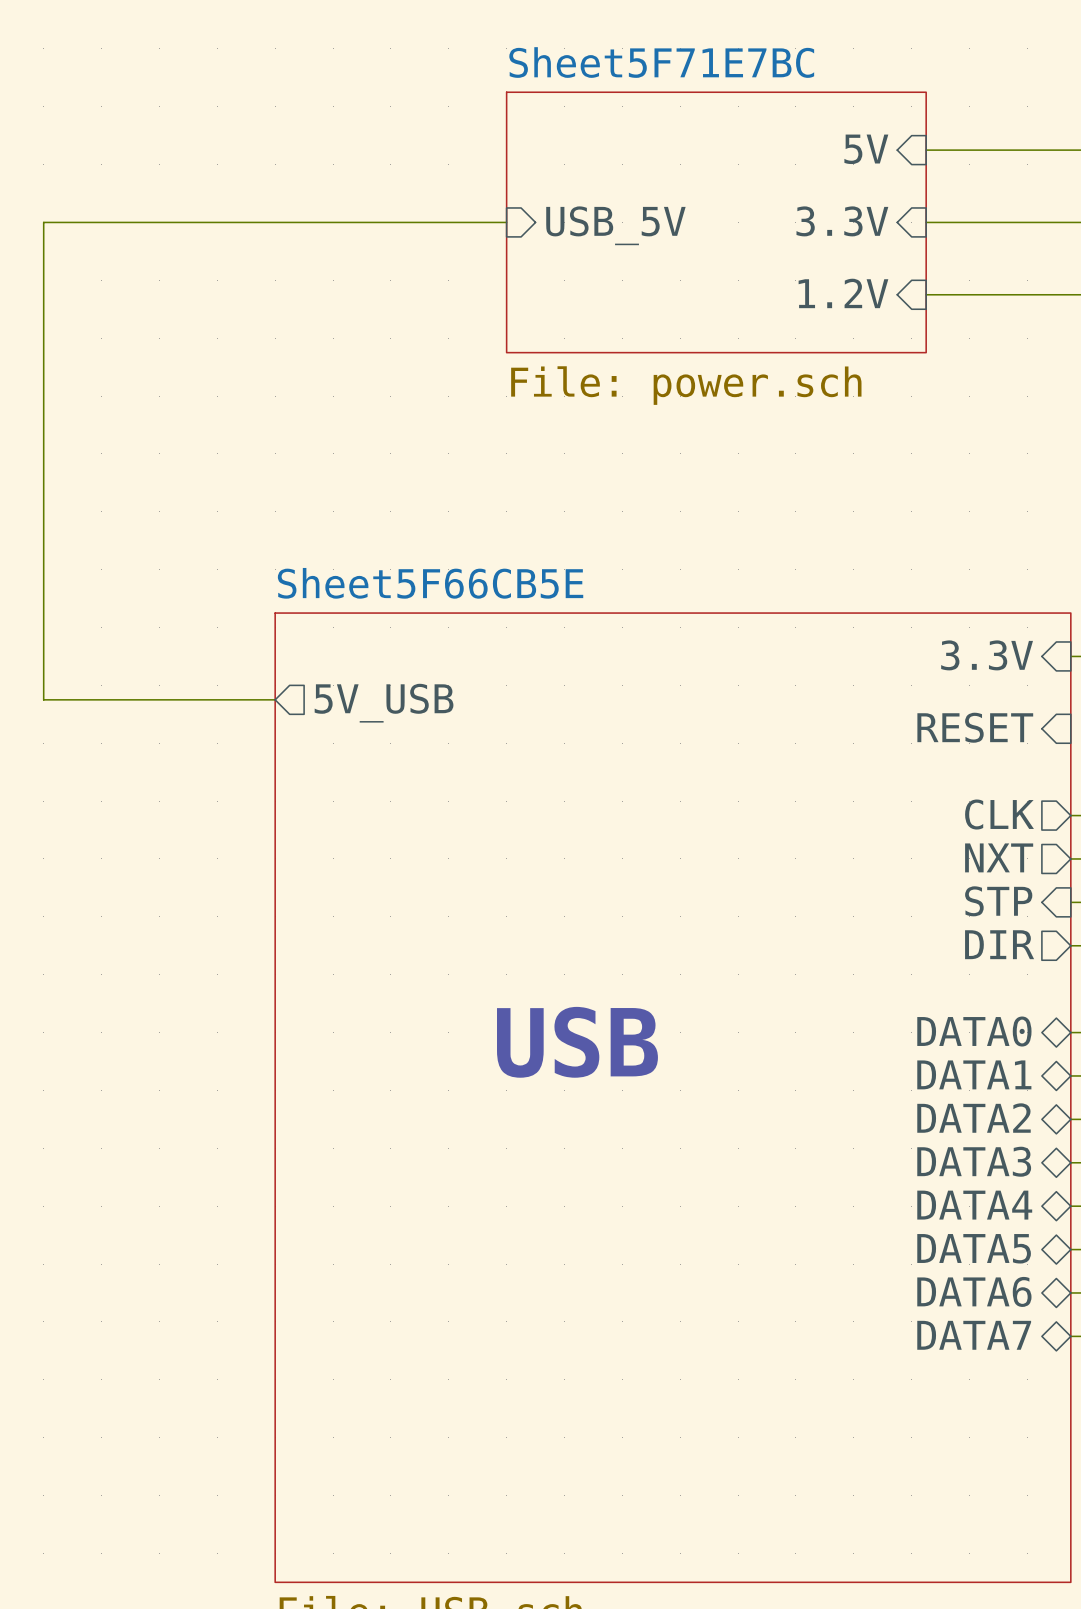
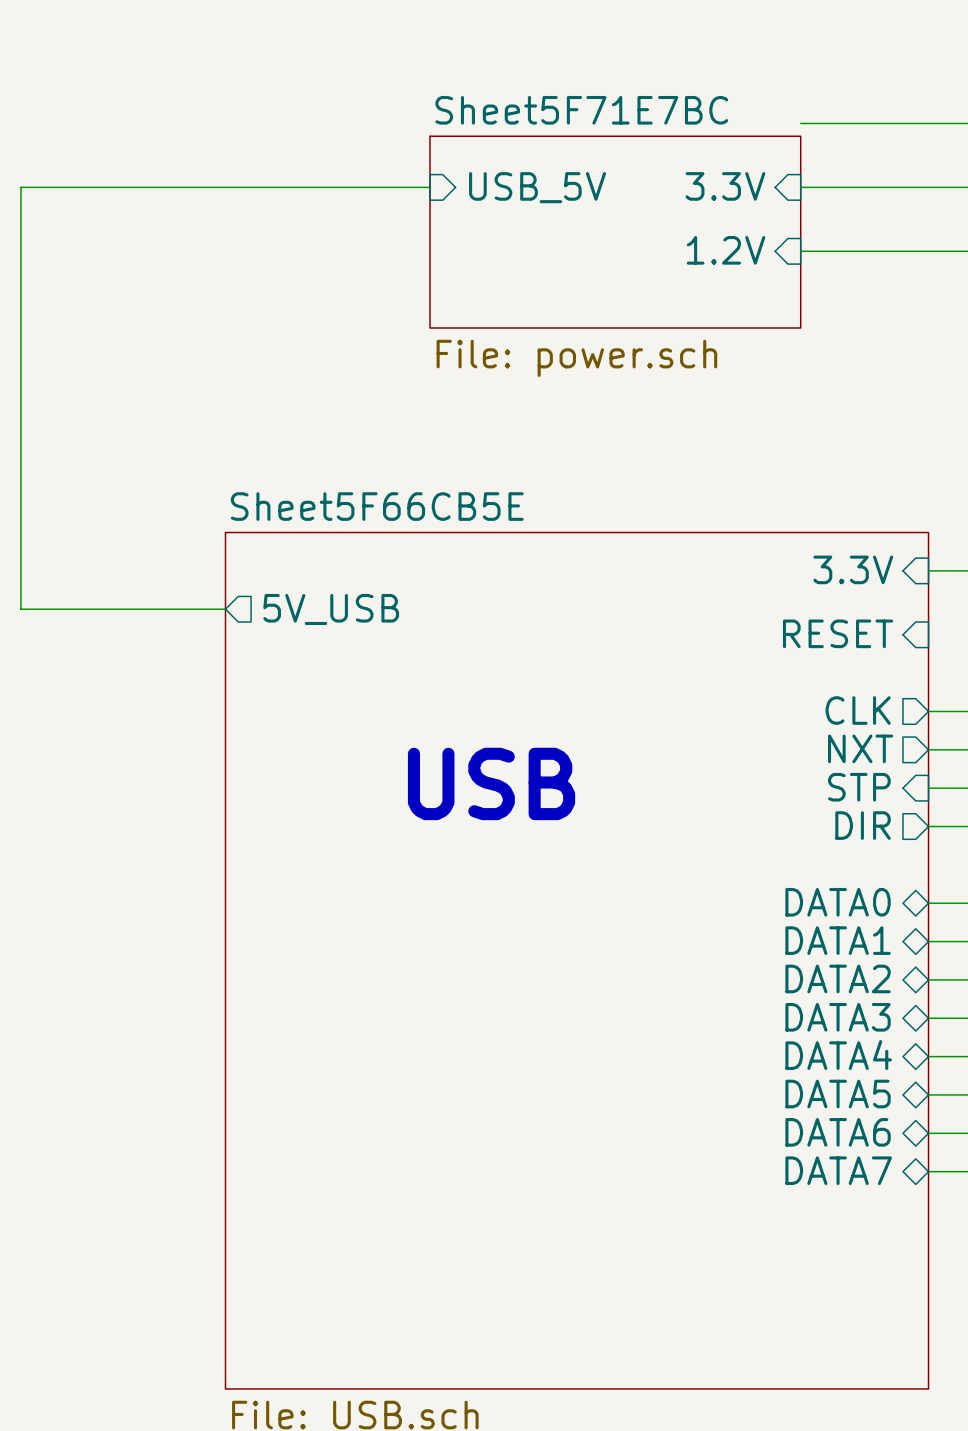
sheet Sheet5F71E7BC shape: [506, 92, 927, 353] -> [430, 136, 801, 329]
sheet pin: 5V (866, 149) -> none
text position: USB (577, 1042) -> USB (491, 783)

